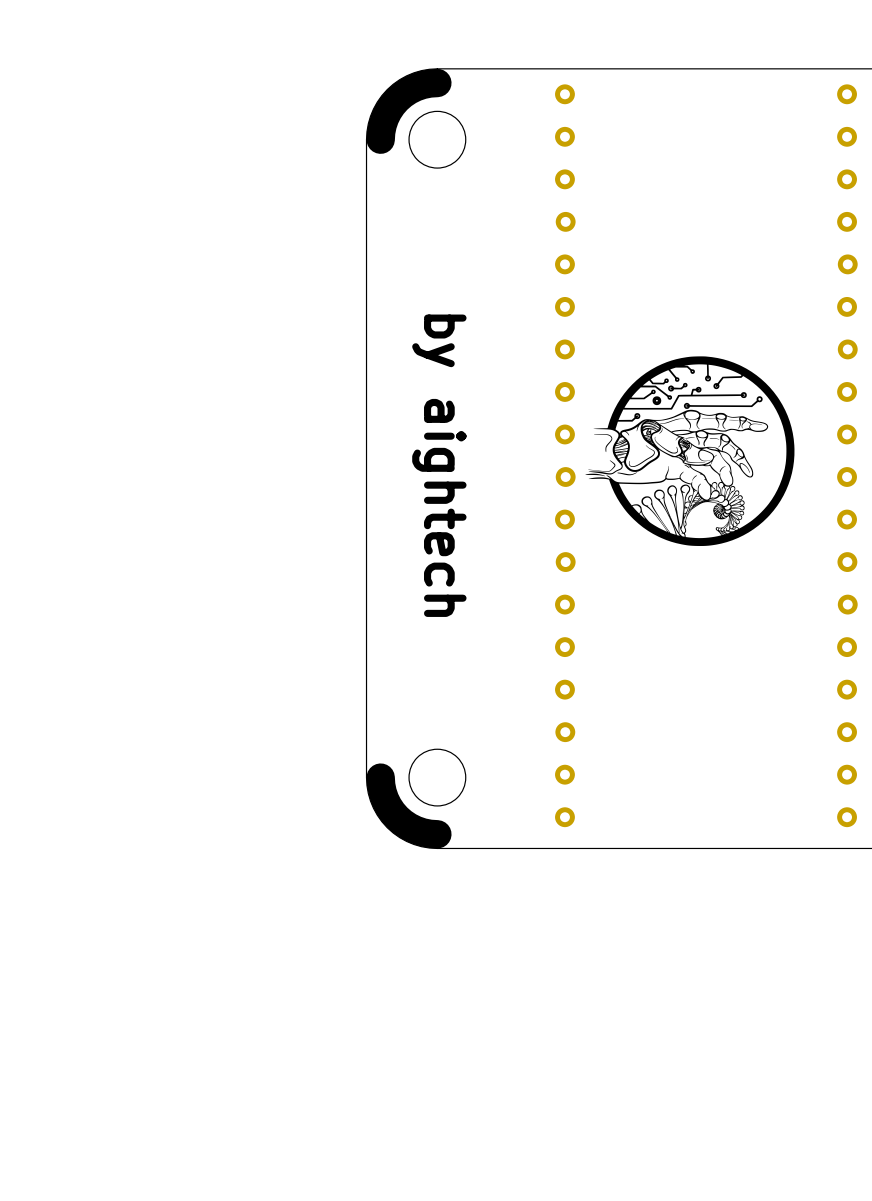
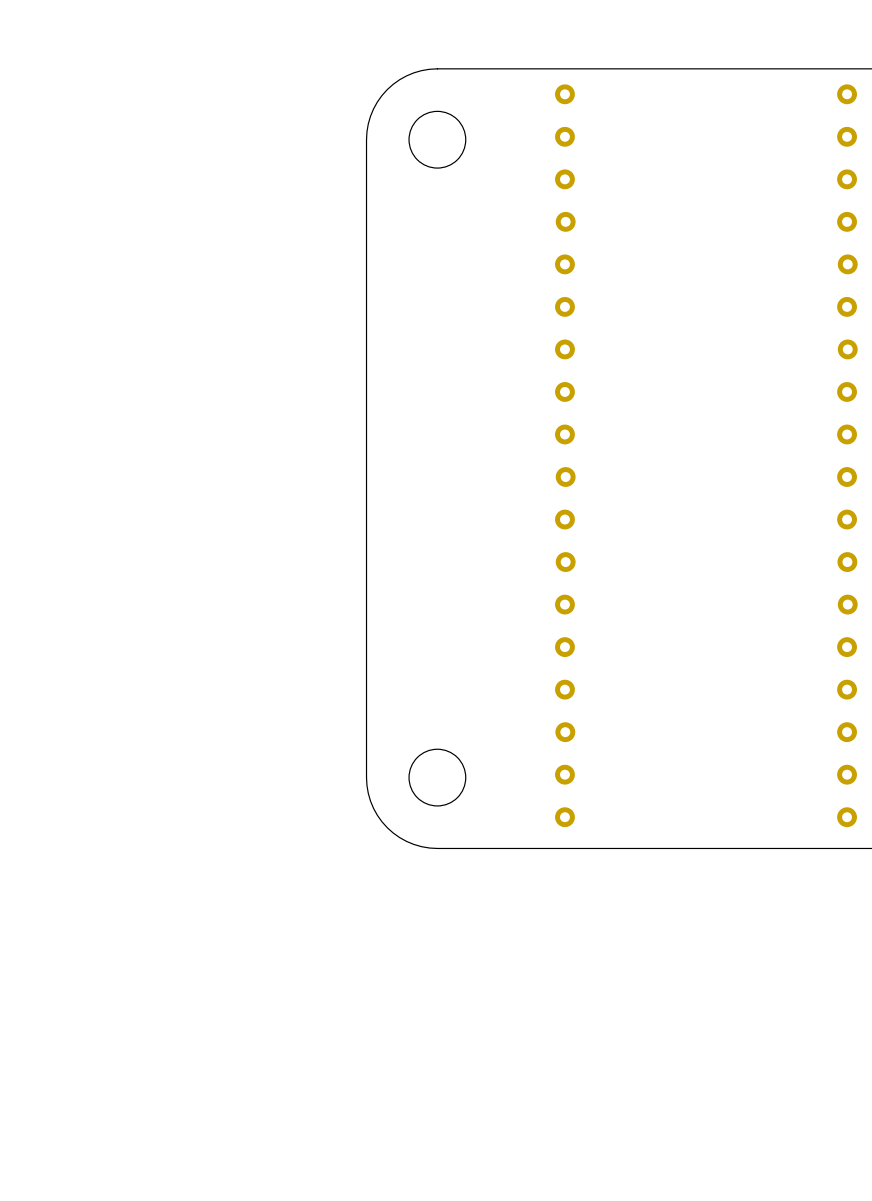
line: (437, 83) (415, 87) (397, 99) (385, 118) (380, 139) -> none
drawing: [585, 356, 795, 547] -> none
text: by aightech (439, 465) -> none
line: (380, 777) (385, 799) (397, 817) (415, 829) (437, 834) -> none

